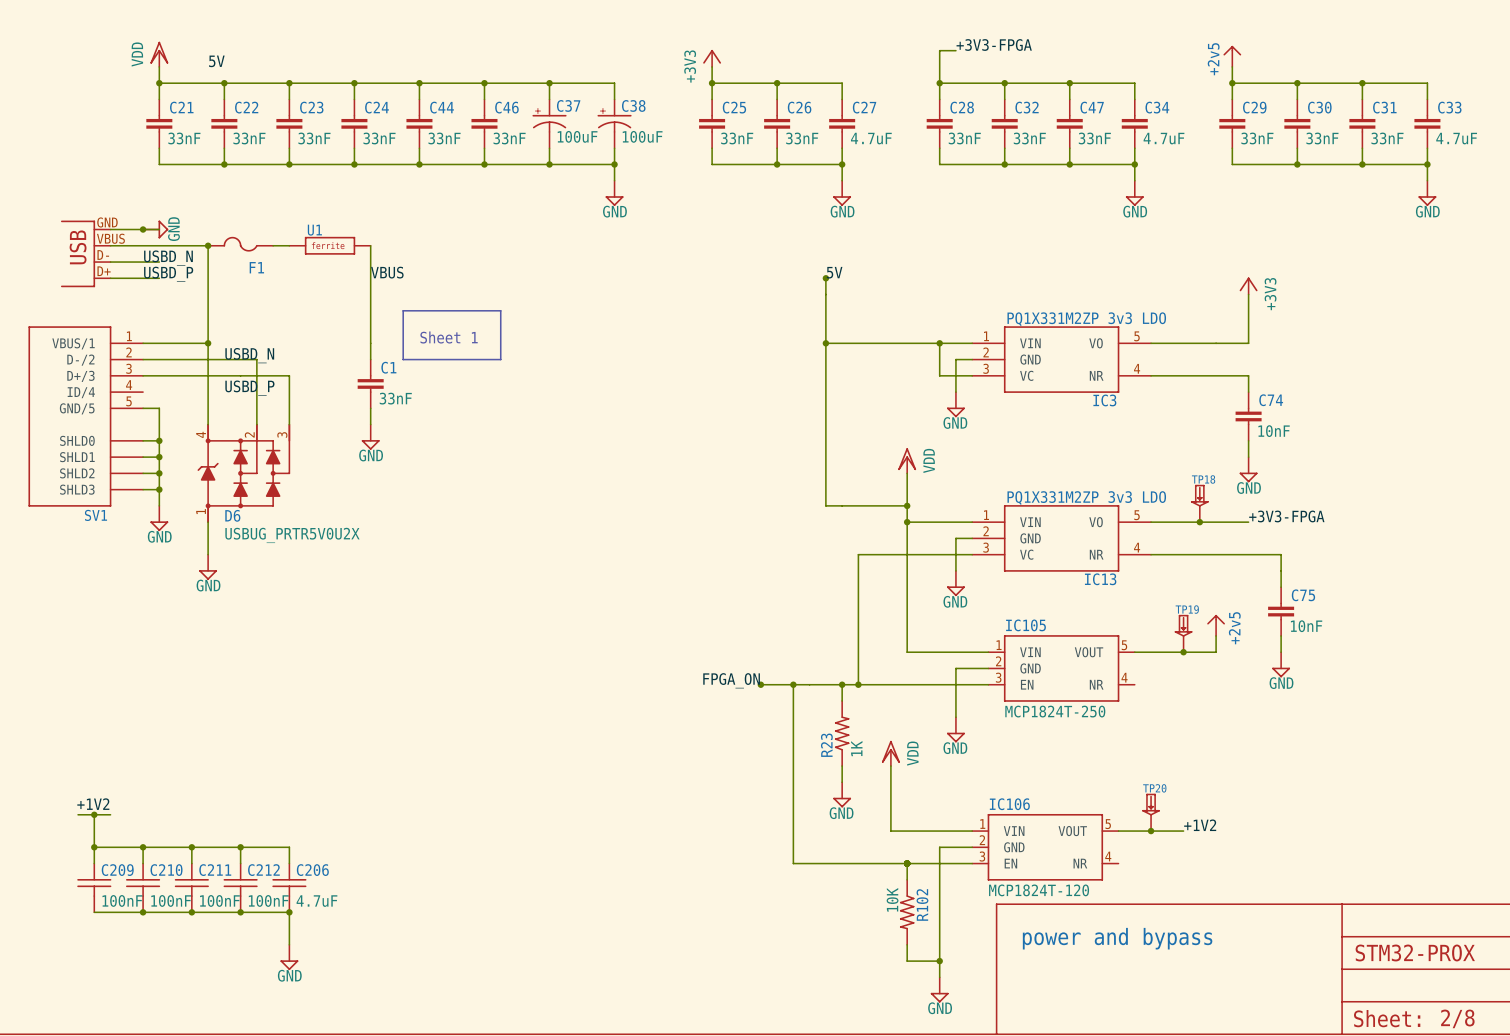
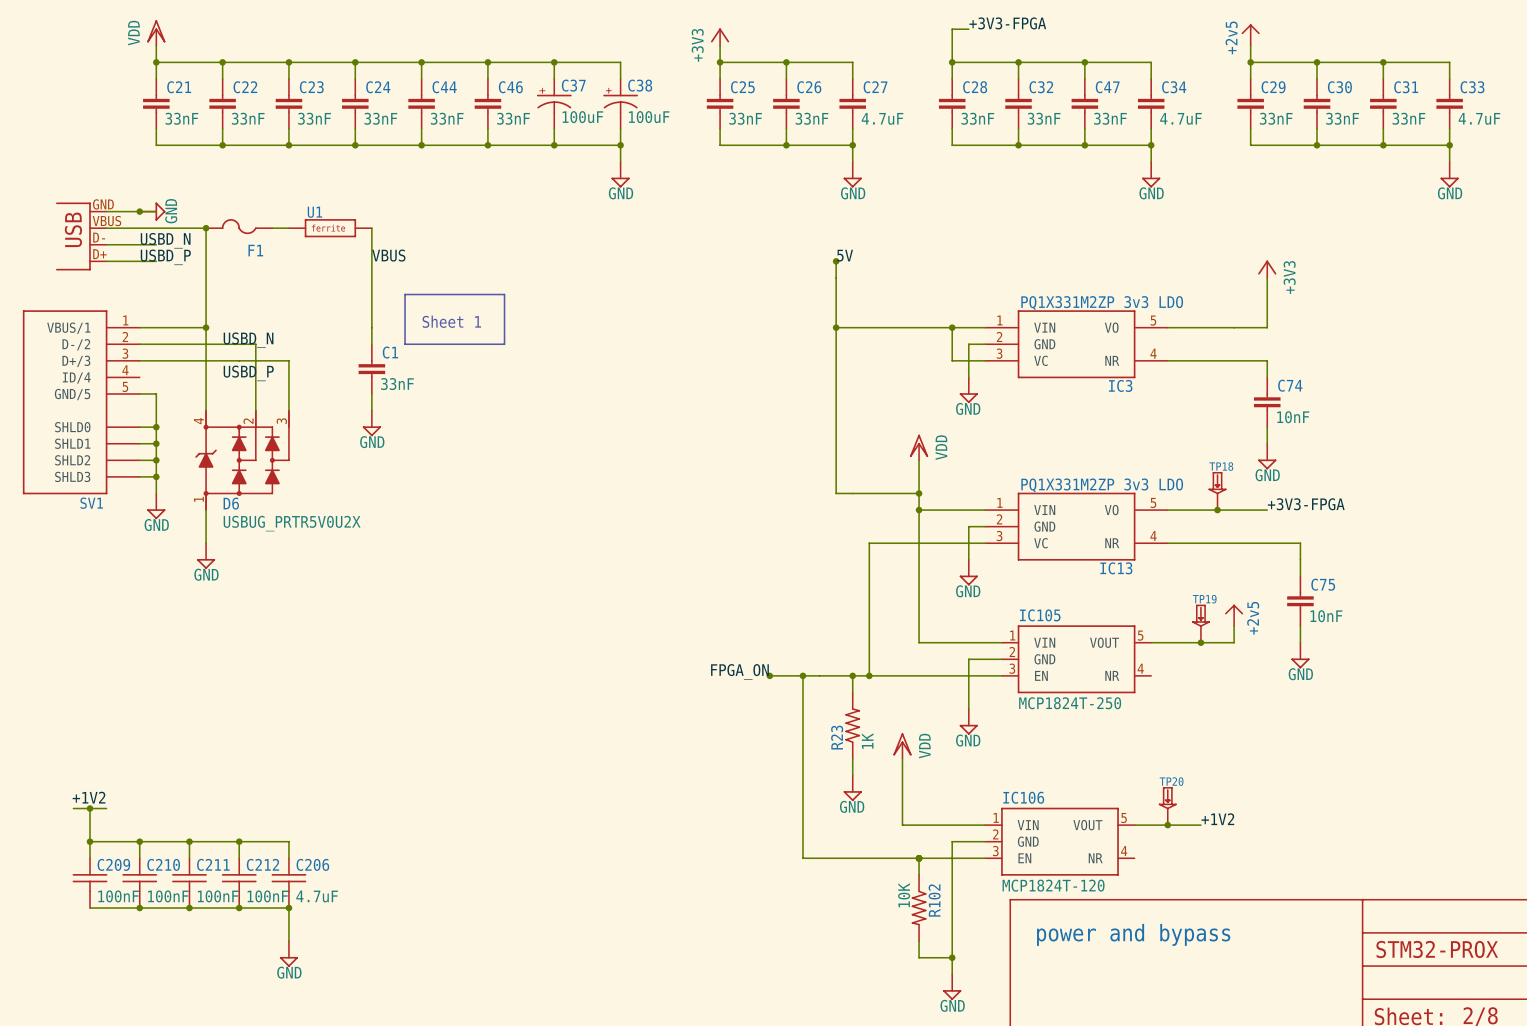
label: 5V (216, 61) -> none

